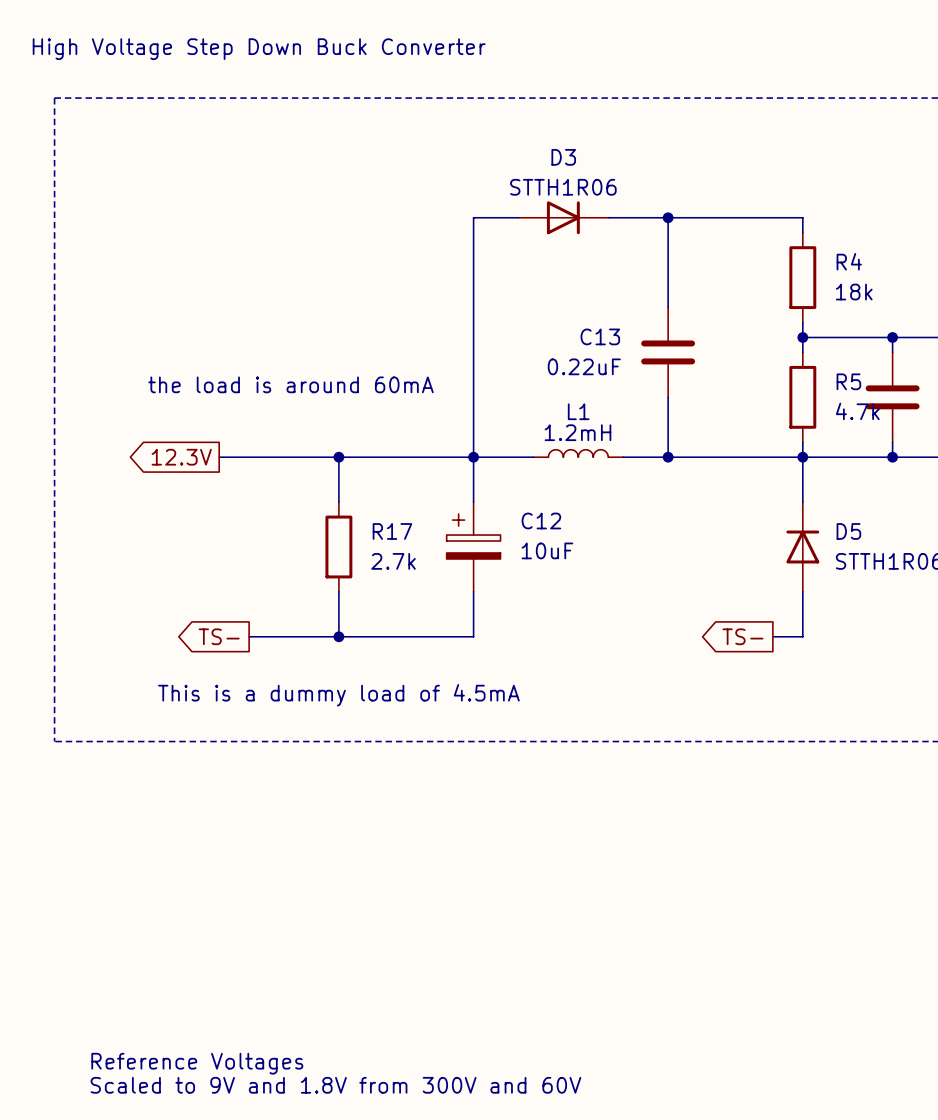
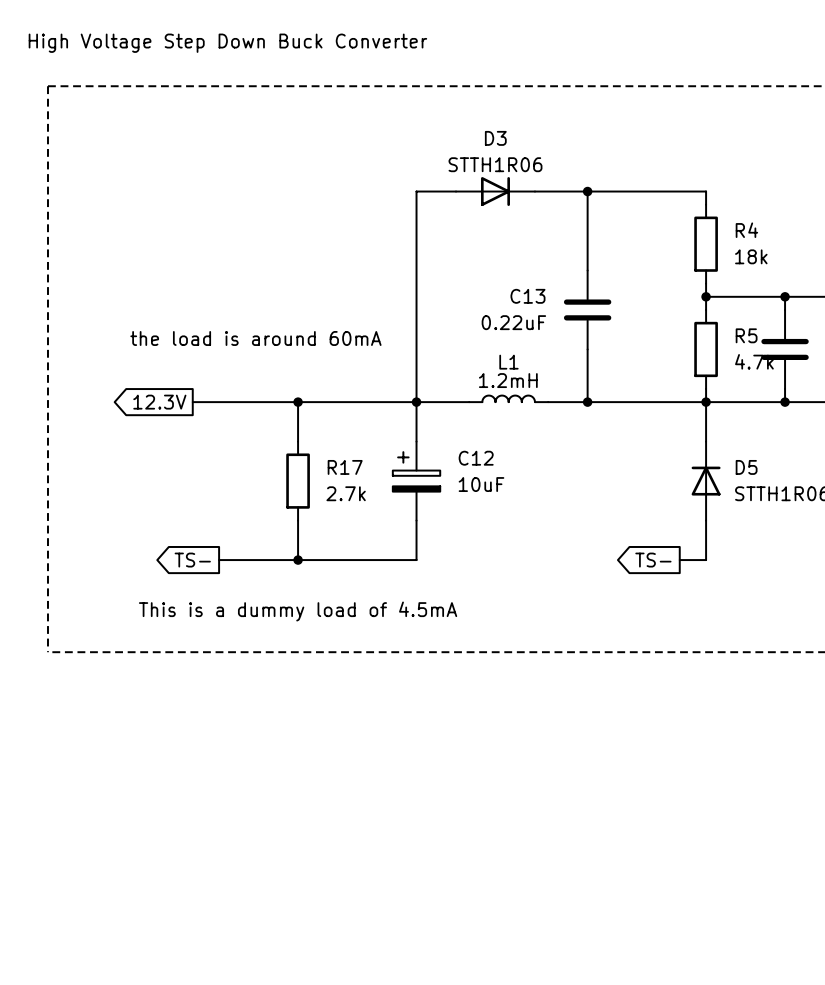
text: Reference Voltages (197, 1063) -> none
text: Scaled to 9V and 1.8V from 300V and 60V (335, 1085) -> none

